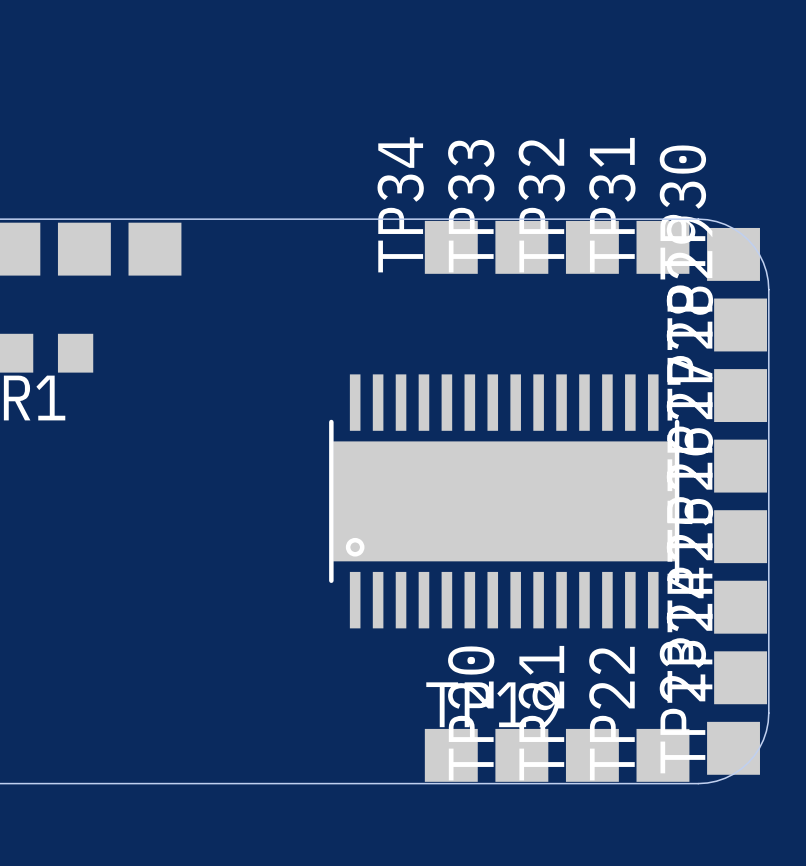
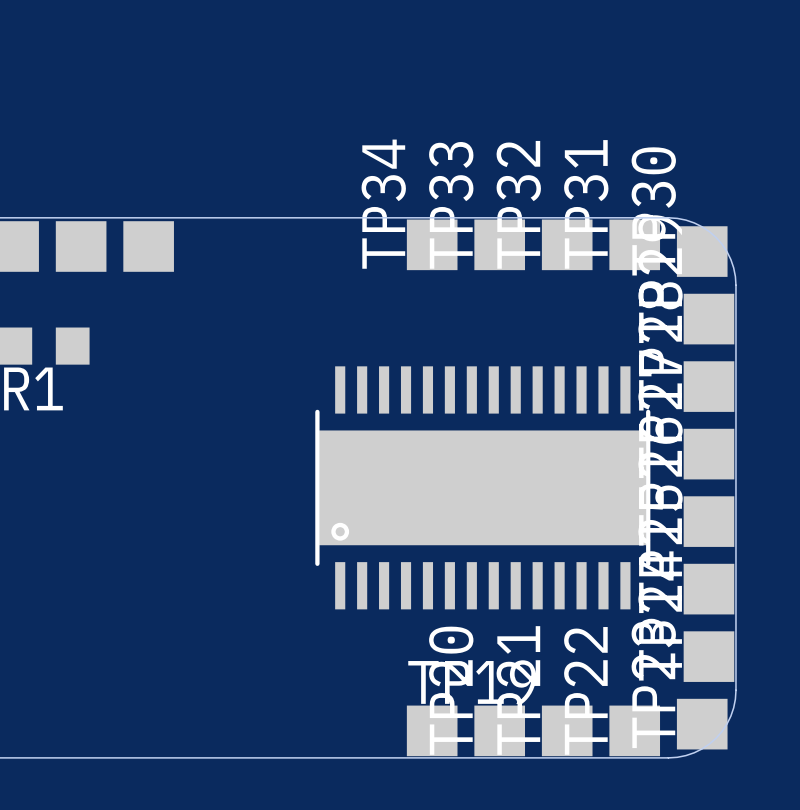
part footprint: [329, 374, 680, 629] -> [315, 366, 651, 610]

